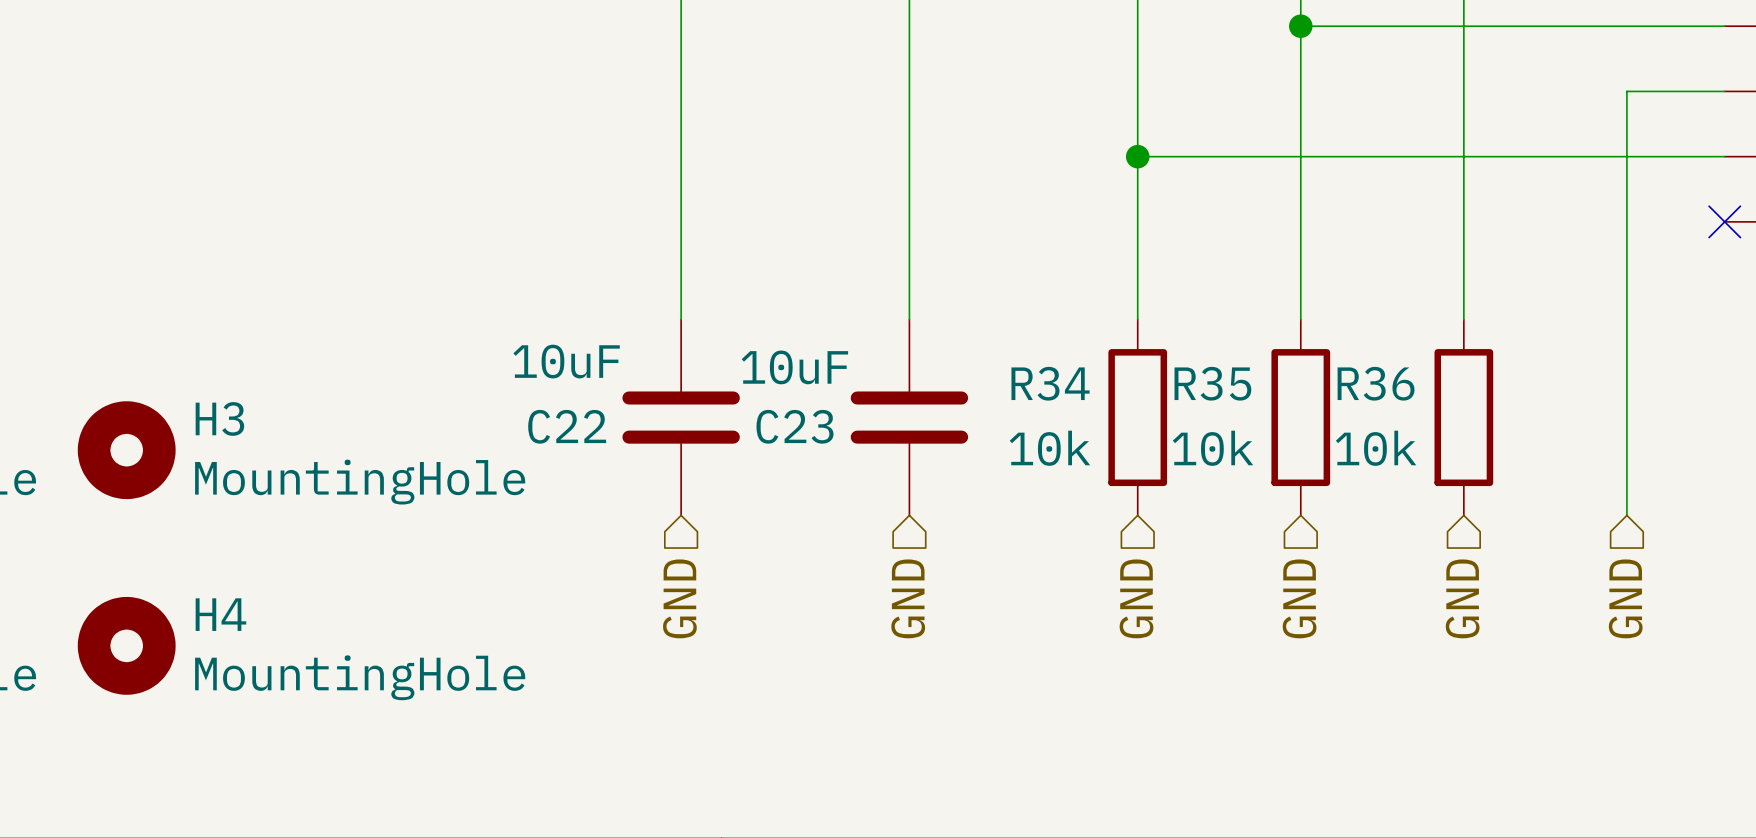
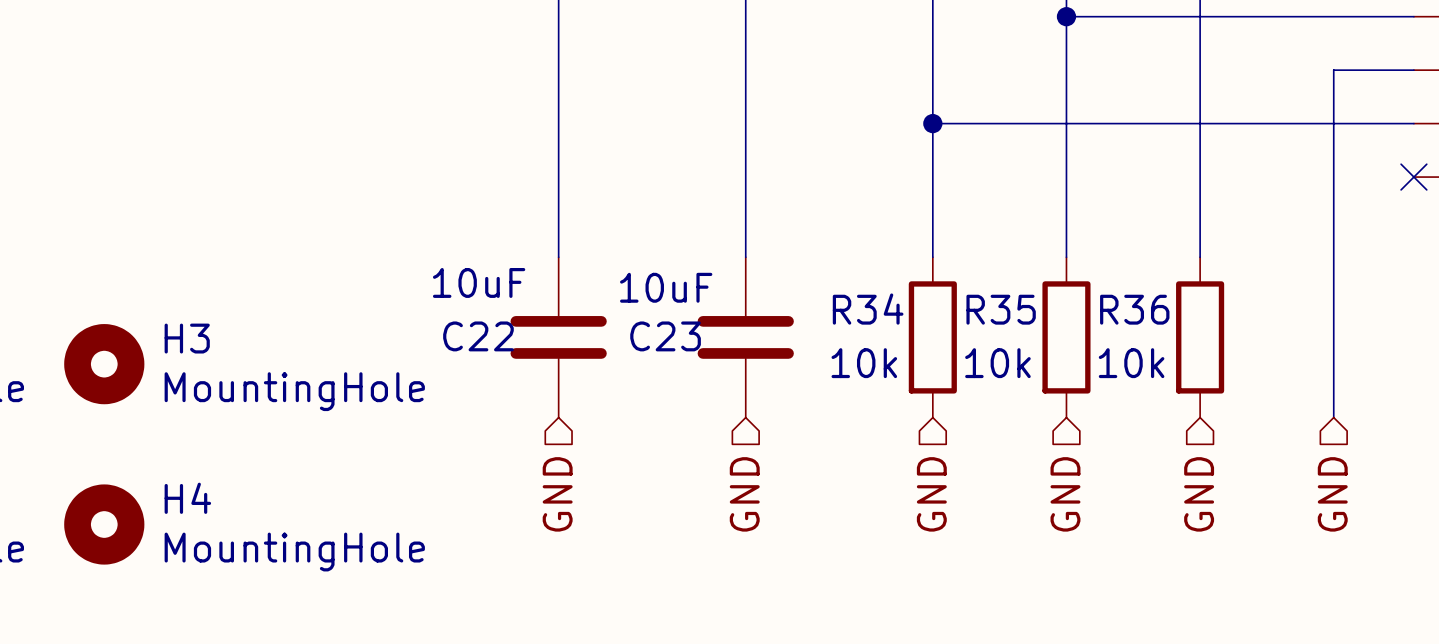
C22 value position: 10uF (566, 361) -> 10uF (479, 282)
C23 value position: 10uF (794, 367) -> 10uF (666, 287)
C22 name position: C22 (567, 426) -> C22 (478, 336)
C23 name position: C23 (794, 426) -> C23 (665, 336)

